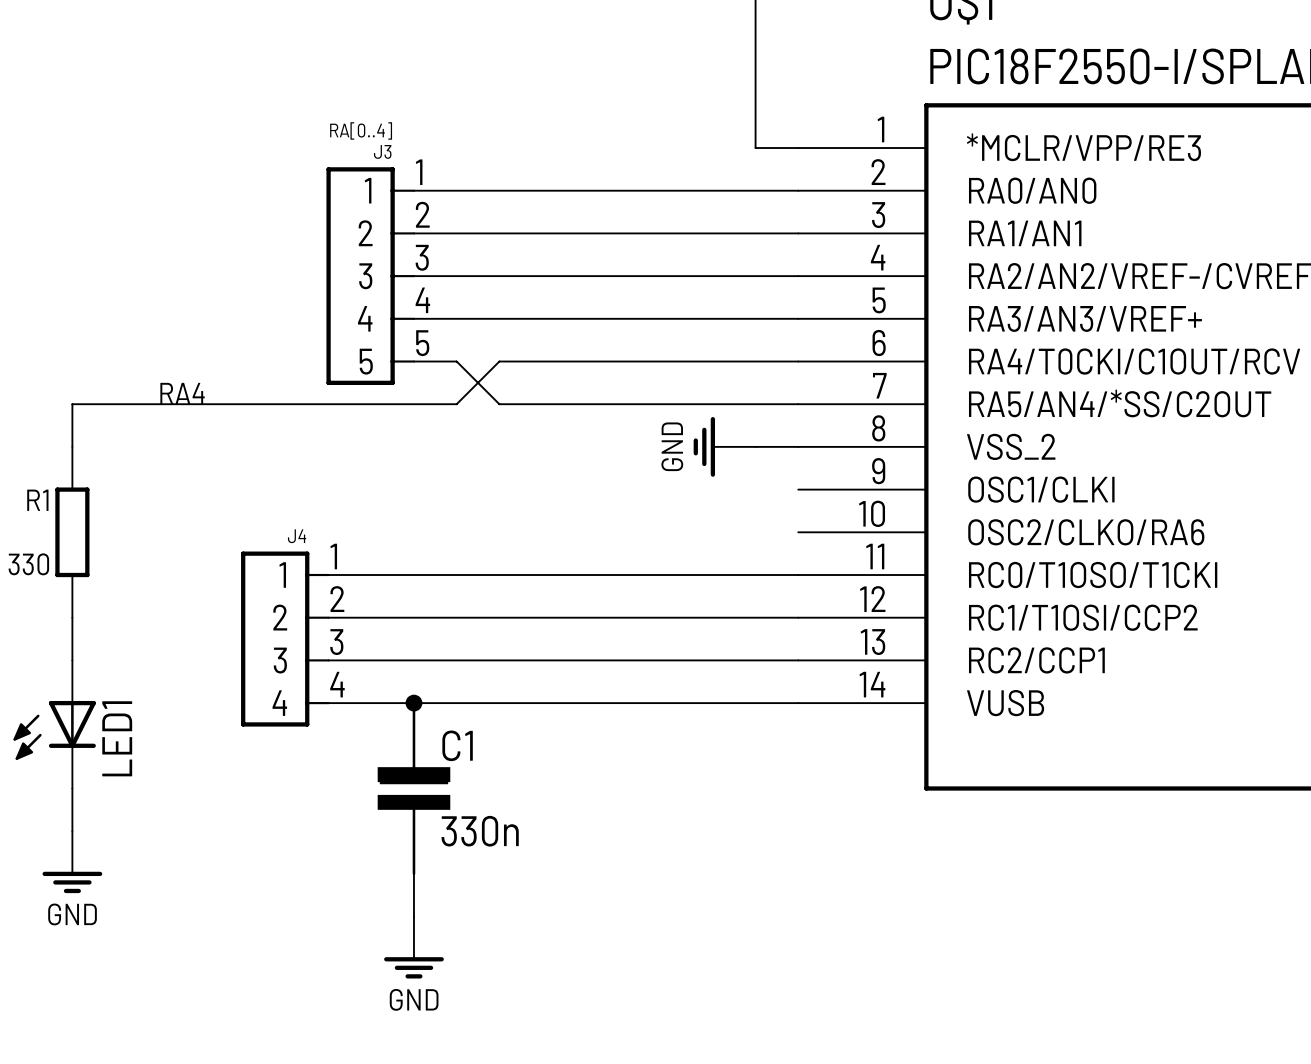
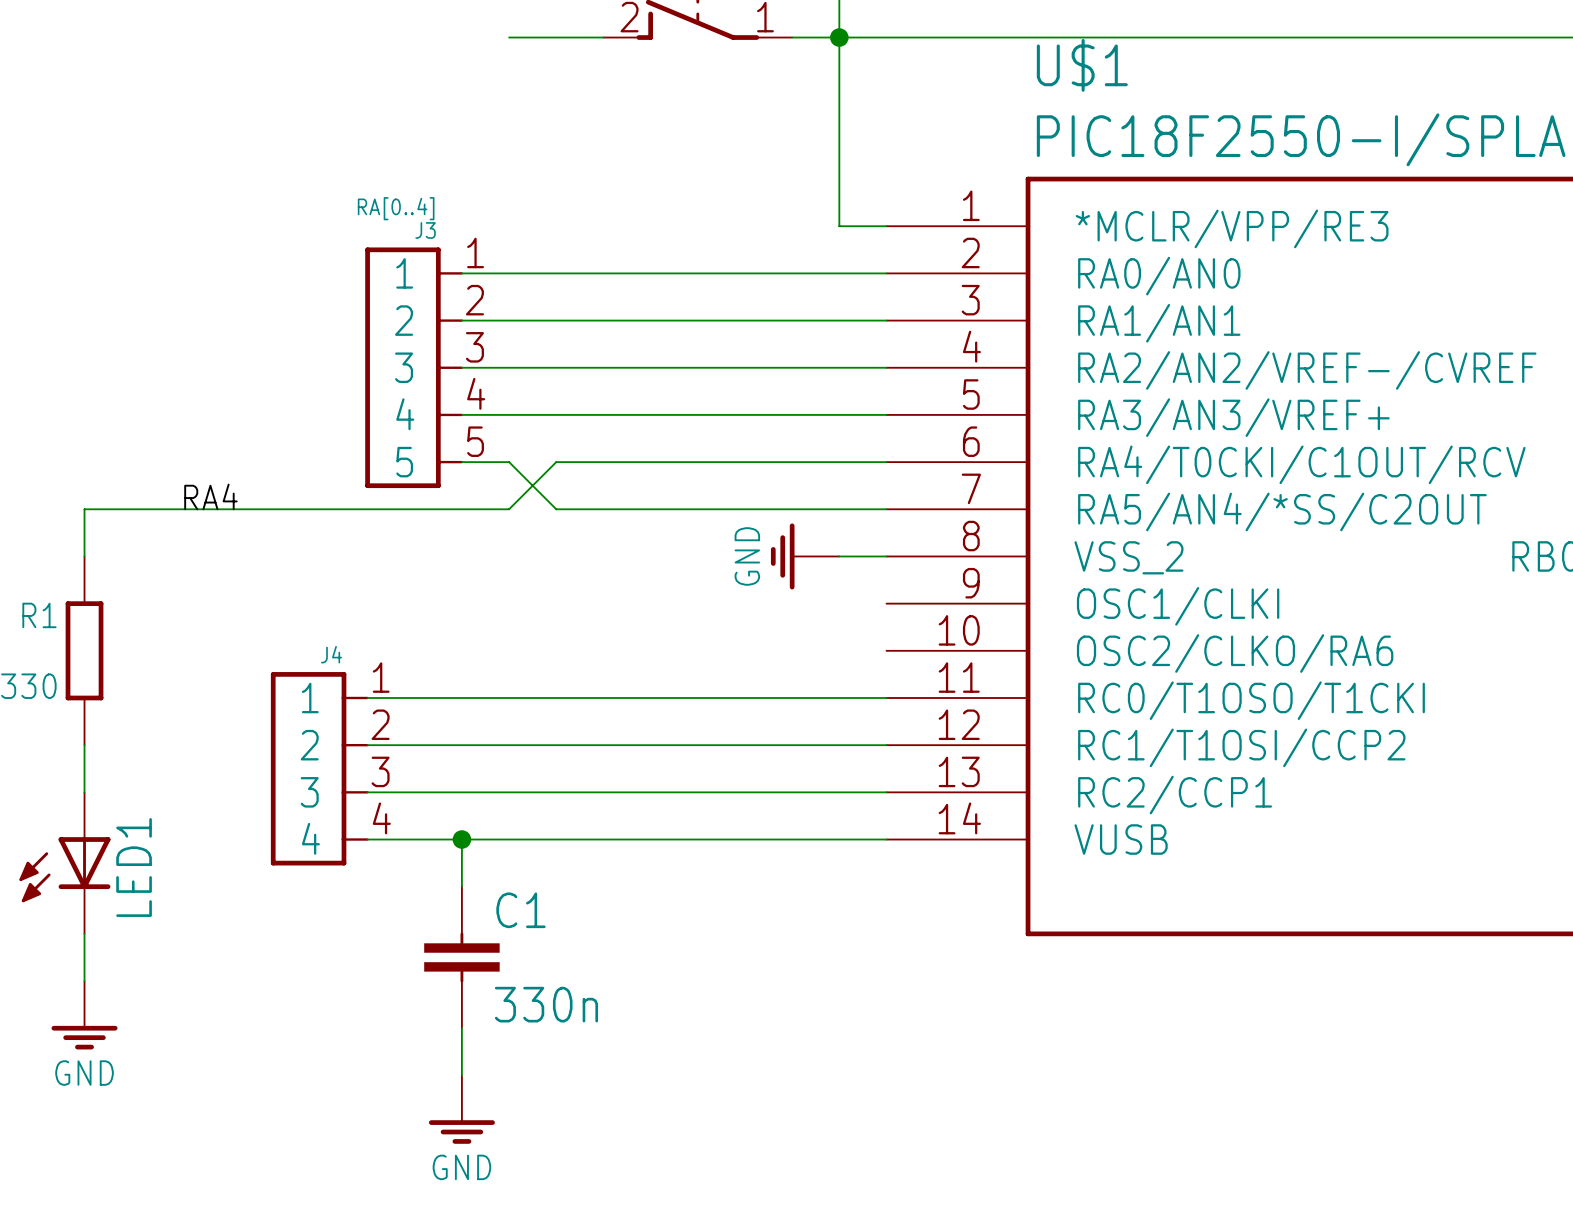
C1 symbol: [377, 701, 451, 876] -> [424, 886, 500, 1029]

